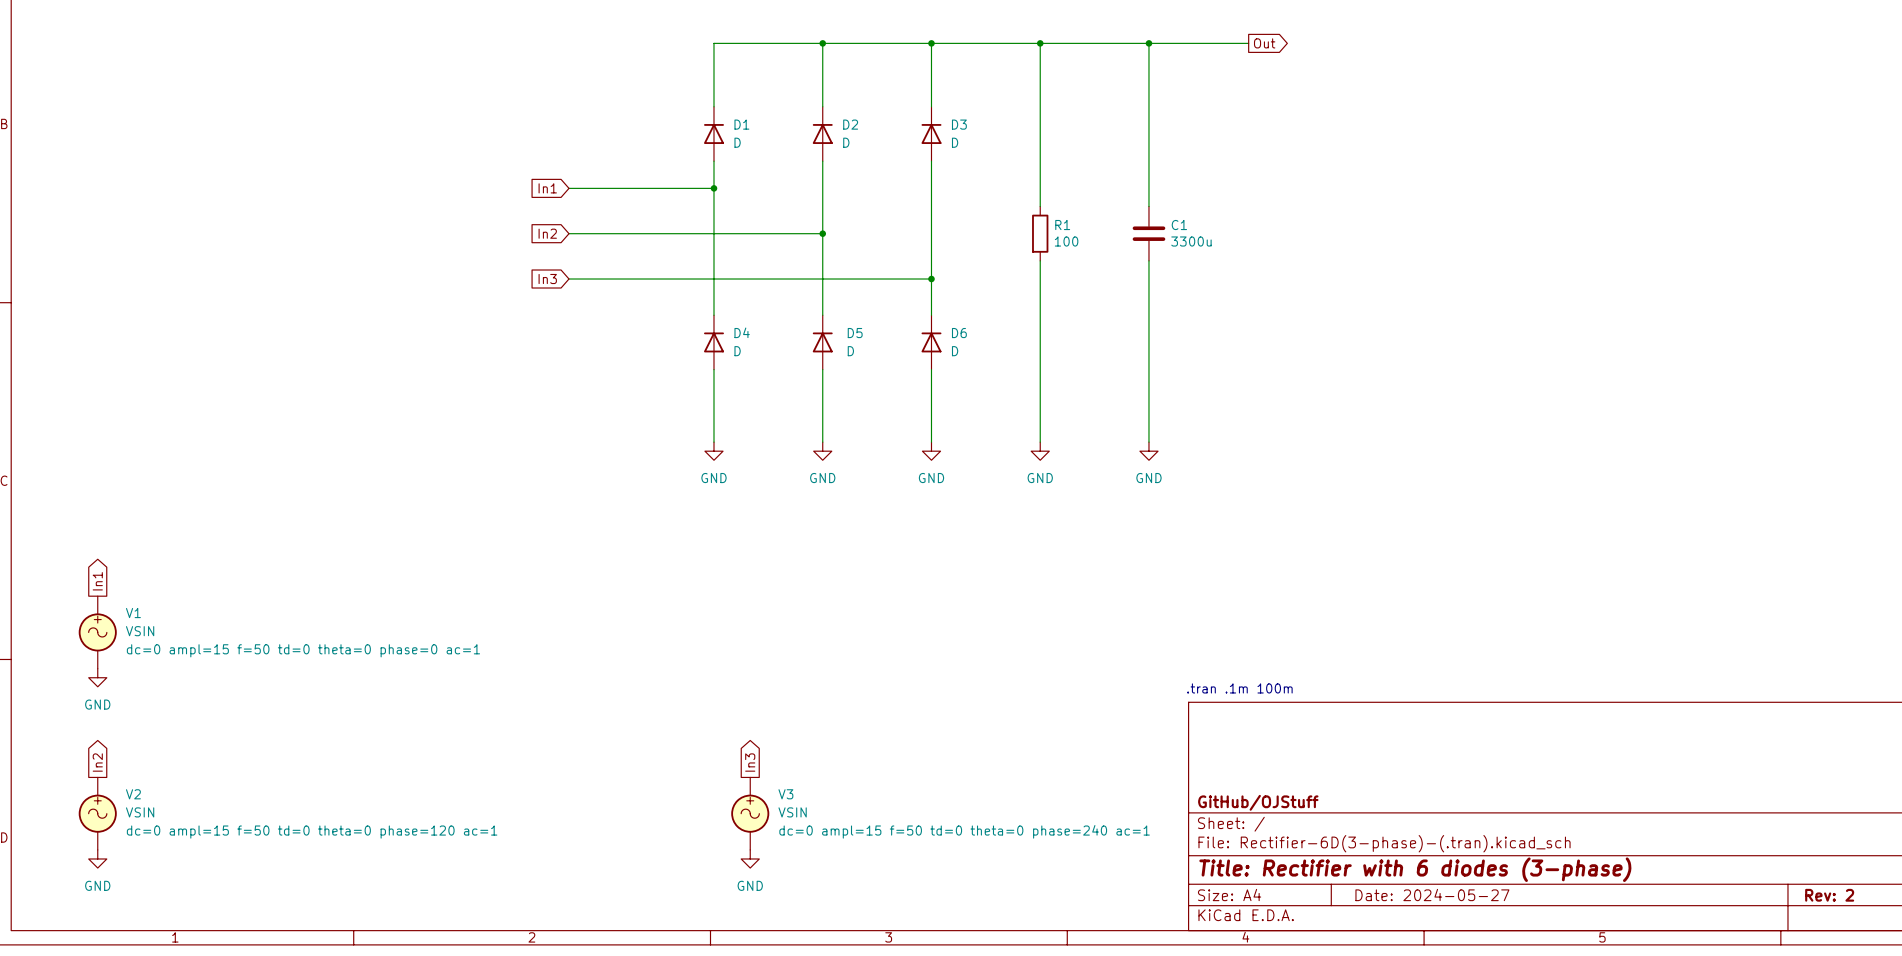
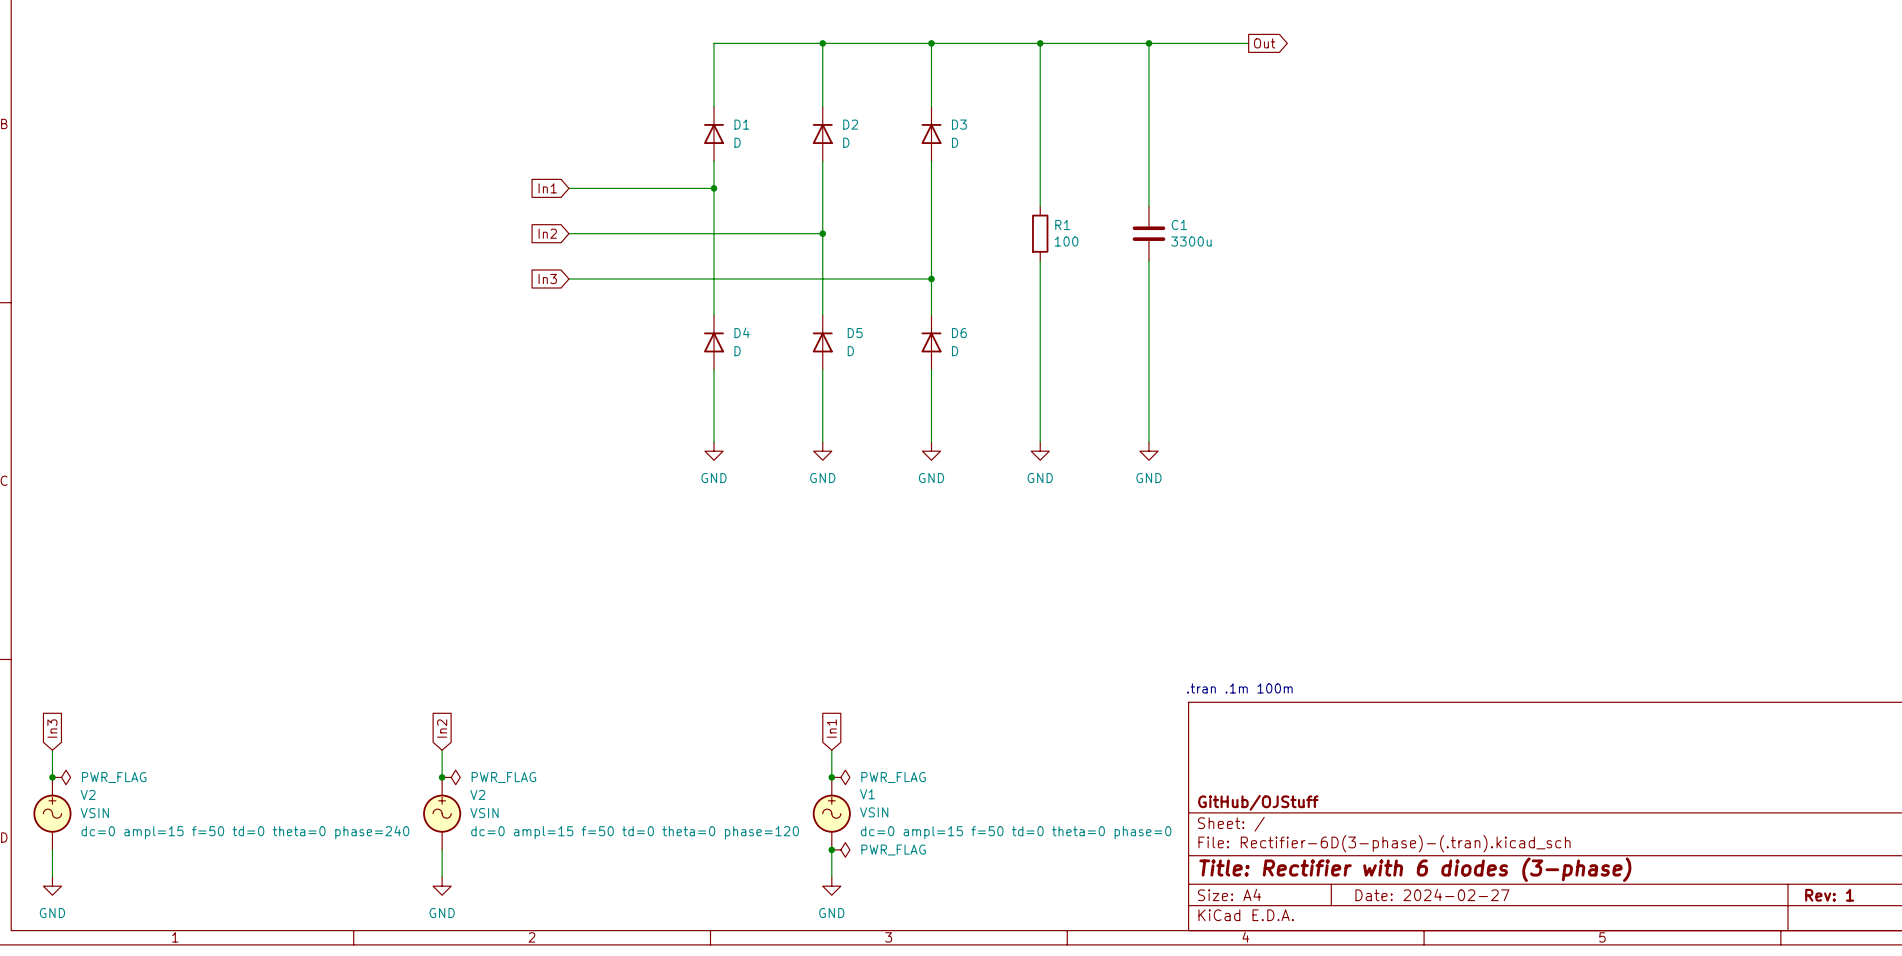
global label: In1 (97, 581) -> none
V1 position: (97, 632) -> (831, 813)
V1 text: dc=0 ampl=15 f=50 td=0 theta=0 phase=0 ac=1 (303, 650) -> dc=0 ampl=15 f=50 td=0 theta=0 phase=0 (1016, 832)
power symbol: GND (97, 677) -> none
global label: none -> In3 (52, 728)
global label: none -> In2 (442, 728)
global label: none -> In1 (831, 728)
wire: none -> (52, 750) (52, 777)
wire: none -> (442, 750) (442, 777)
wire: none -> (831, 750) (831, 777)
global label: In2 (97, 762) -> none
global label: In3 (750, 762) -> none
junction: none -> (52, 777)
power symbol: none -> PWR_FLAG (61, 777)
junction: none -> (442, 777)
power symbol: none -> PWR_FLAG (451, 777)
junction: none -> (831, 777)
power symbol: none -> PWR_FLAG (840, 777)
V2: none -> VSIN (52, 813)
V2: VSIN (97, 813) -> none
V2: none -> VSIN (442, 813)
V3: VSIN (750, 813) -> none
wire: none -> (52, 849) (52, 877)
wire: none -> (442, 849) (442, 877)
wire: none -> (831, 849) (831, 877)
junction: none -> (831, 849)
power symbol: none -> PWR_FLAG (840, 849)
power symbol position: GND (97, 858) -> GND (52, 886)
power symbol position: GND (750, 858) -> GND (831, 886)
power symbol: none -> GND (442, 886)
title block: Date: 2024-05-27 (1432, 895) -> Date: 2024-02-27 (1432, 895)
title block: Rev: 2 (1829, 895) -> Rev: 1 (1829, 895)

